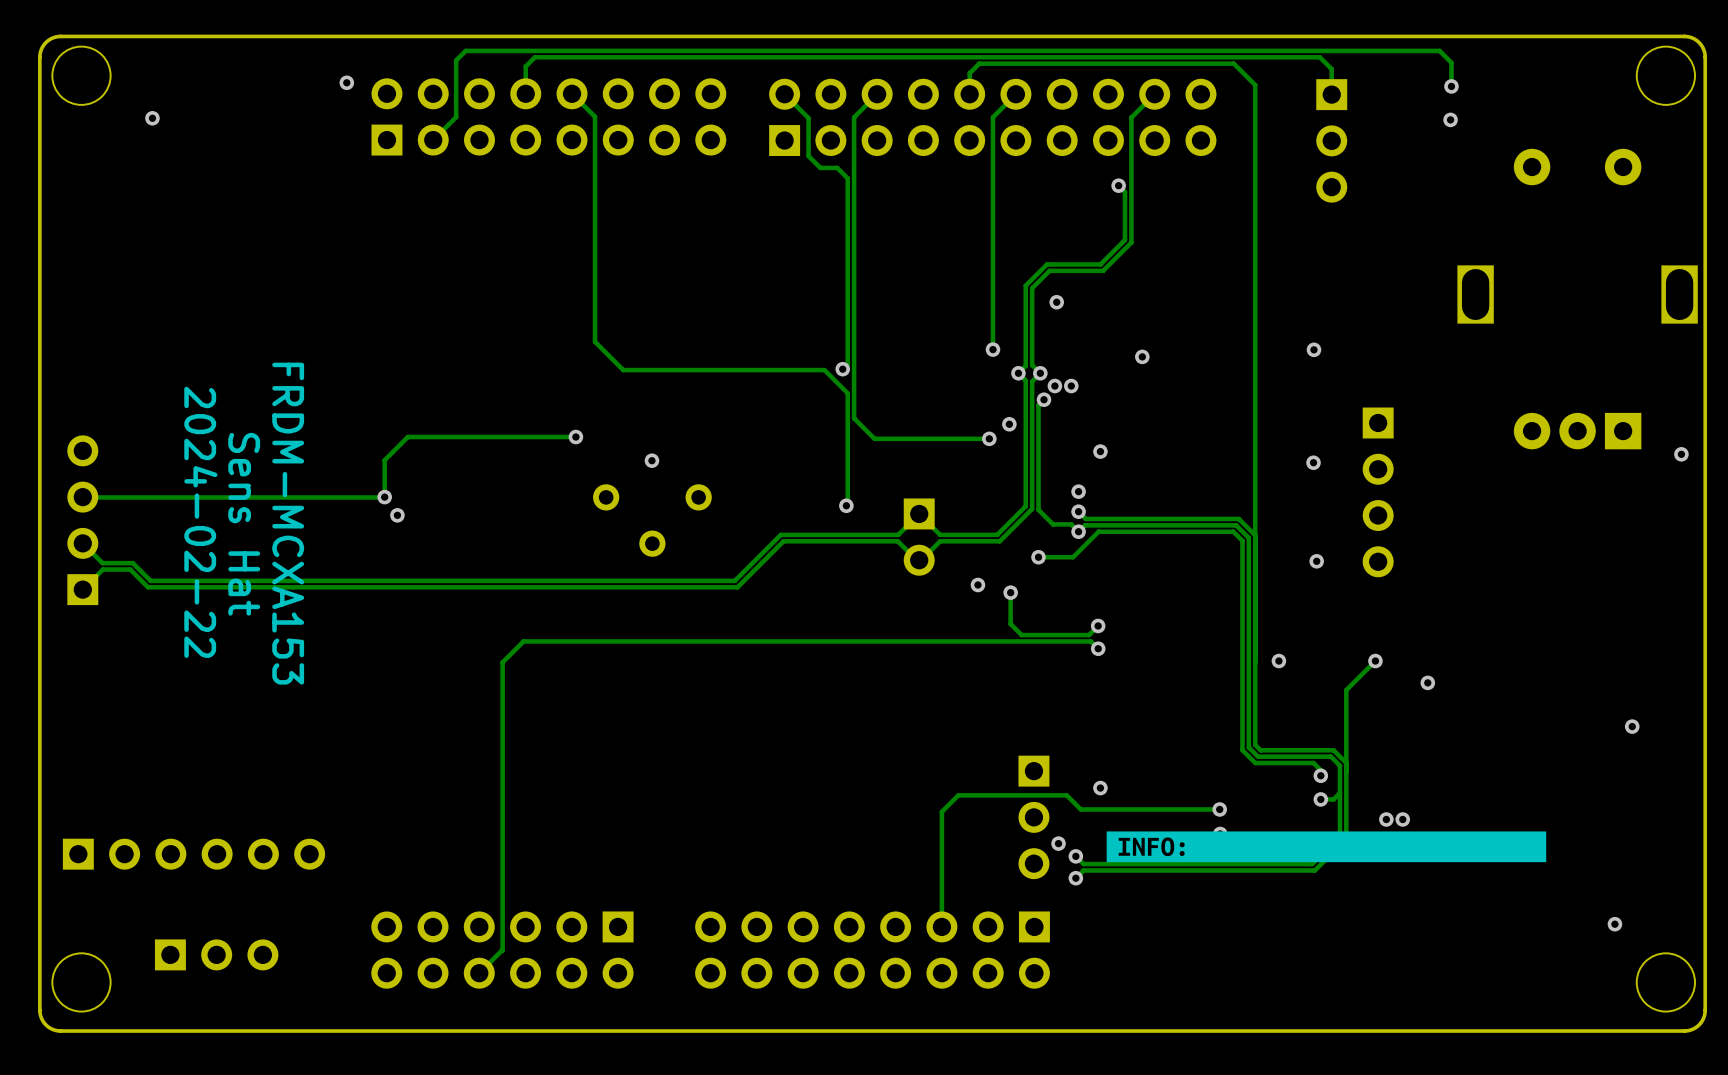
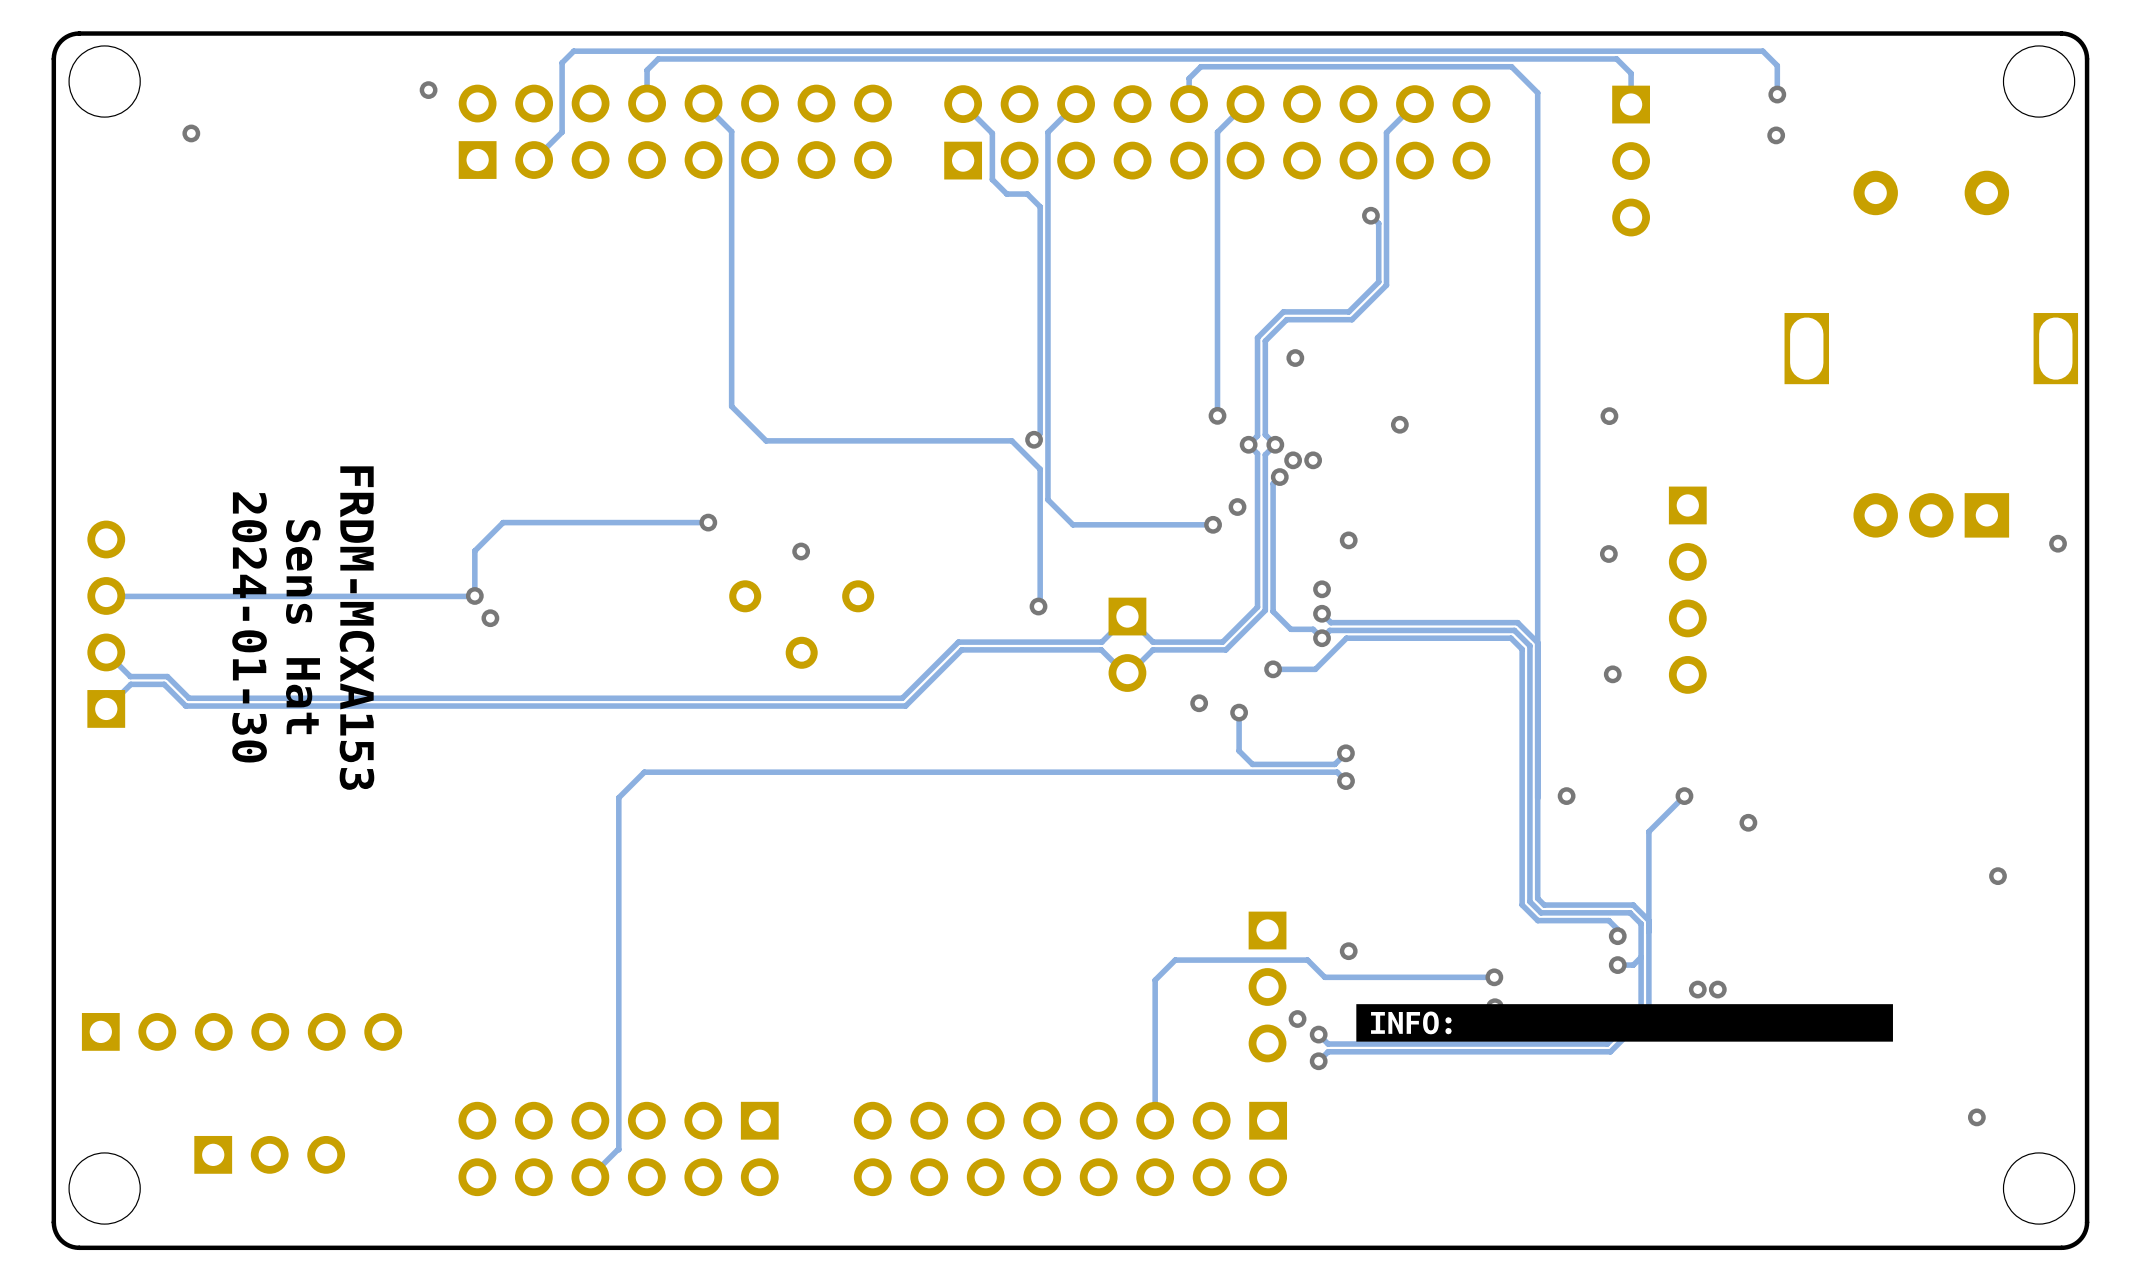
text: 2024-02-22 (200, 522) -> 2024-01-30 (249, 627)

